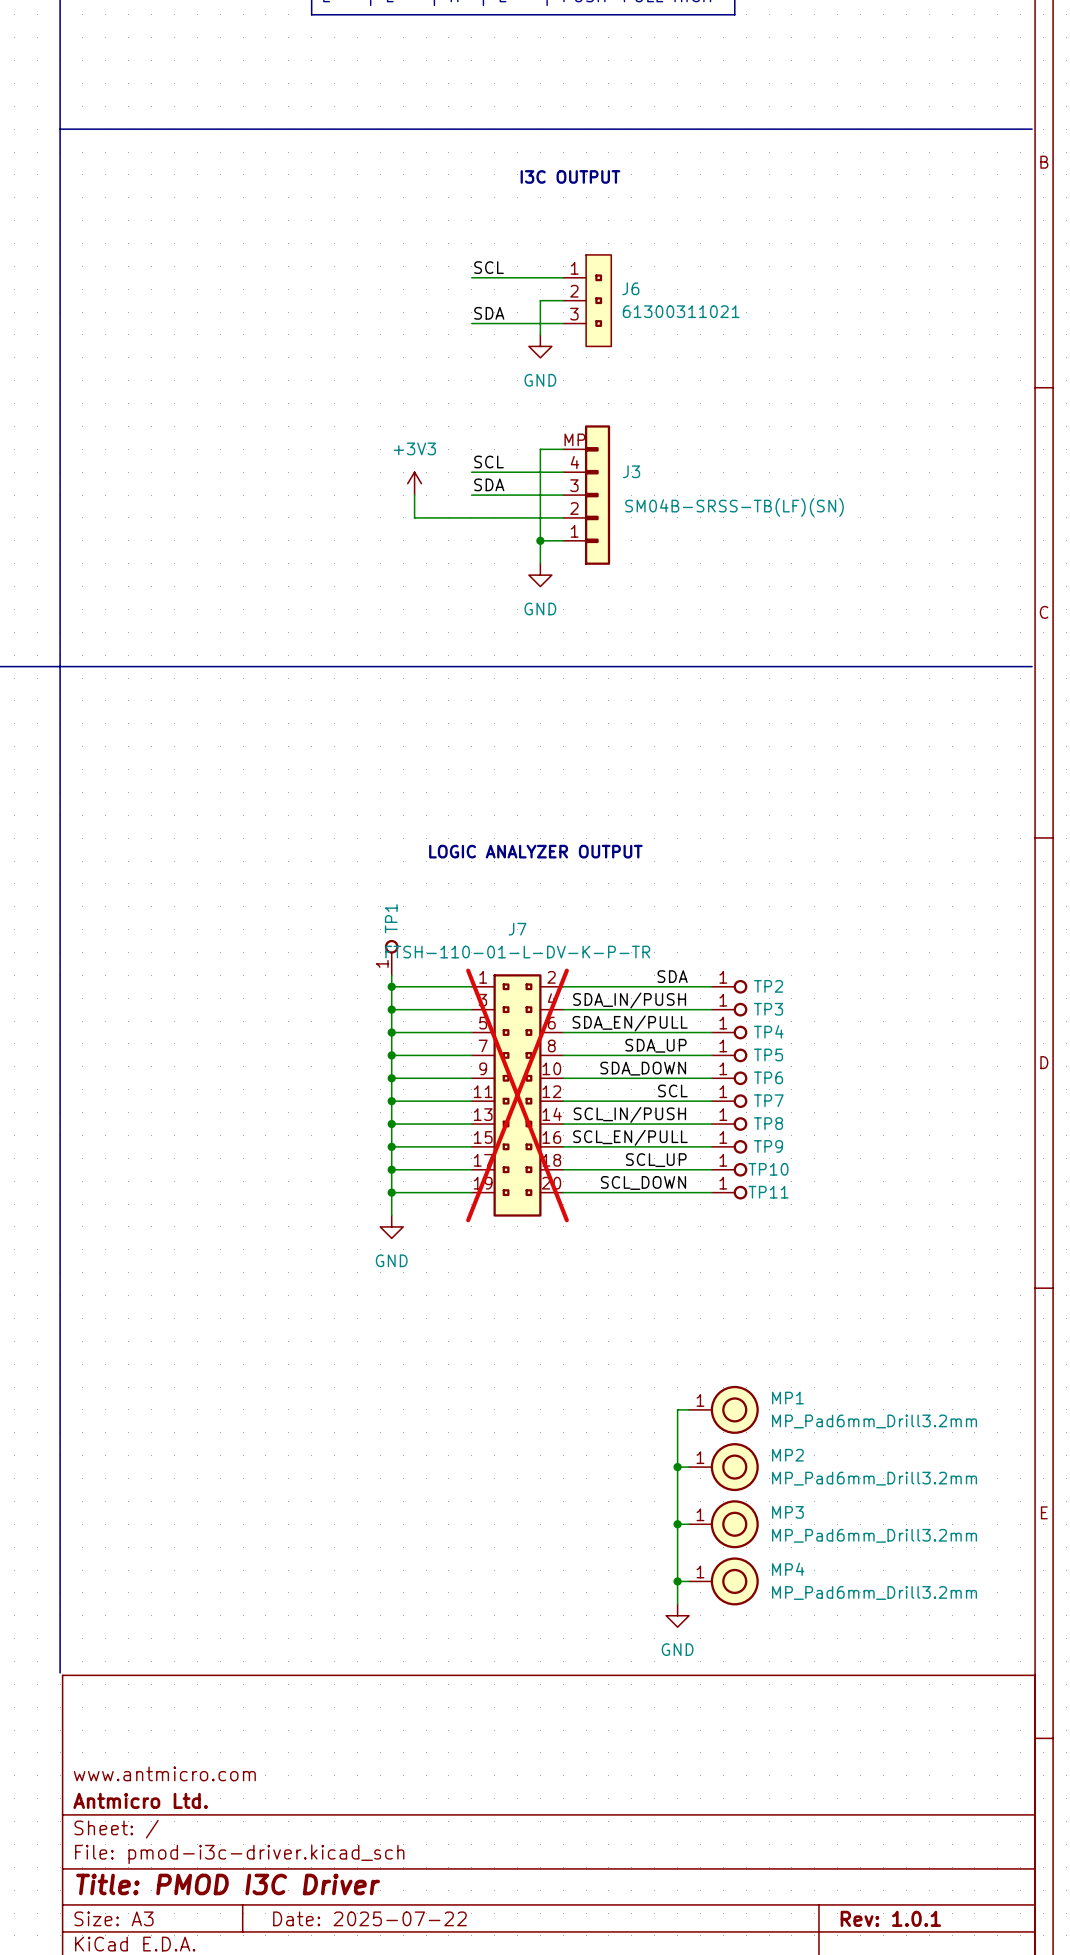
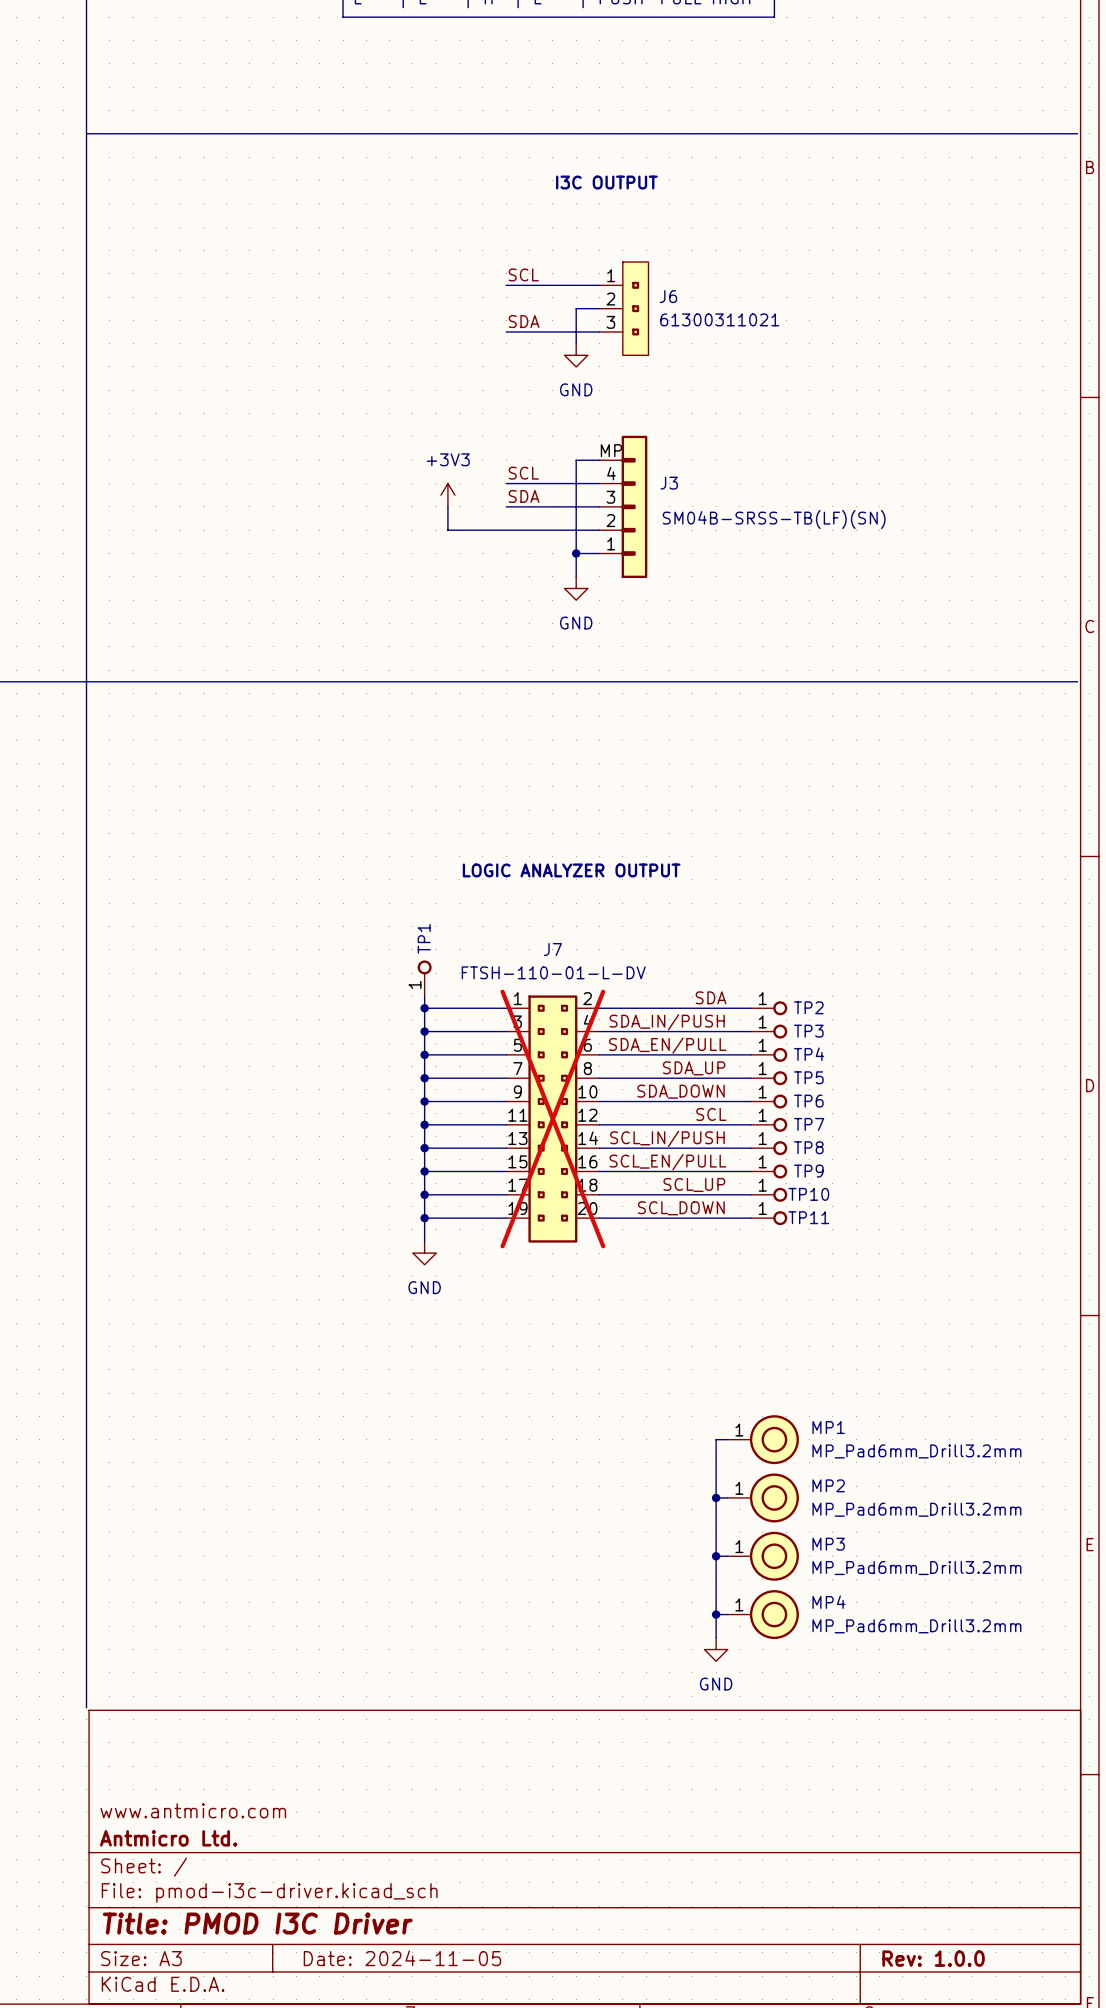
J7 text: FTSH-110-01-L-DV-K-P-TR (517, 952) -> FTSH-110-01-L-DV (553, 972)
title block: Date: 2025-07-22 (369, 1918) -> Date: 2024-11-05 (402, 1958)
title block: Rev: 1.0.1 (890, 1918) -> Rev: 1.0.0 (933, 1958)

